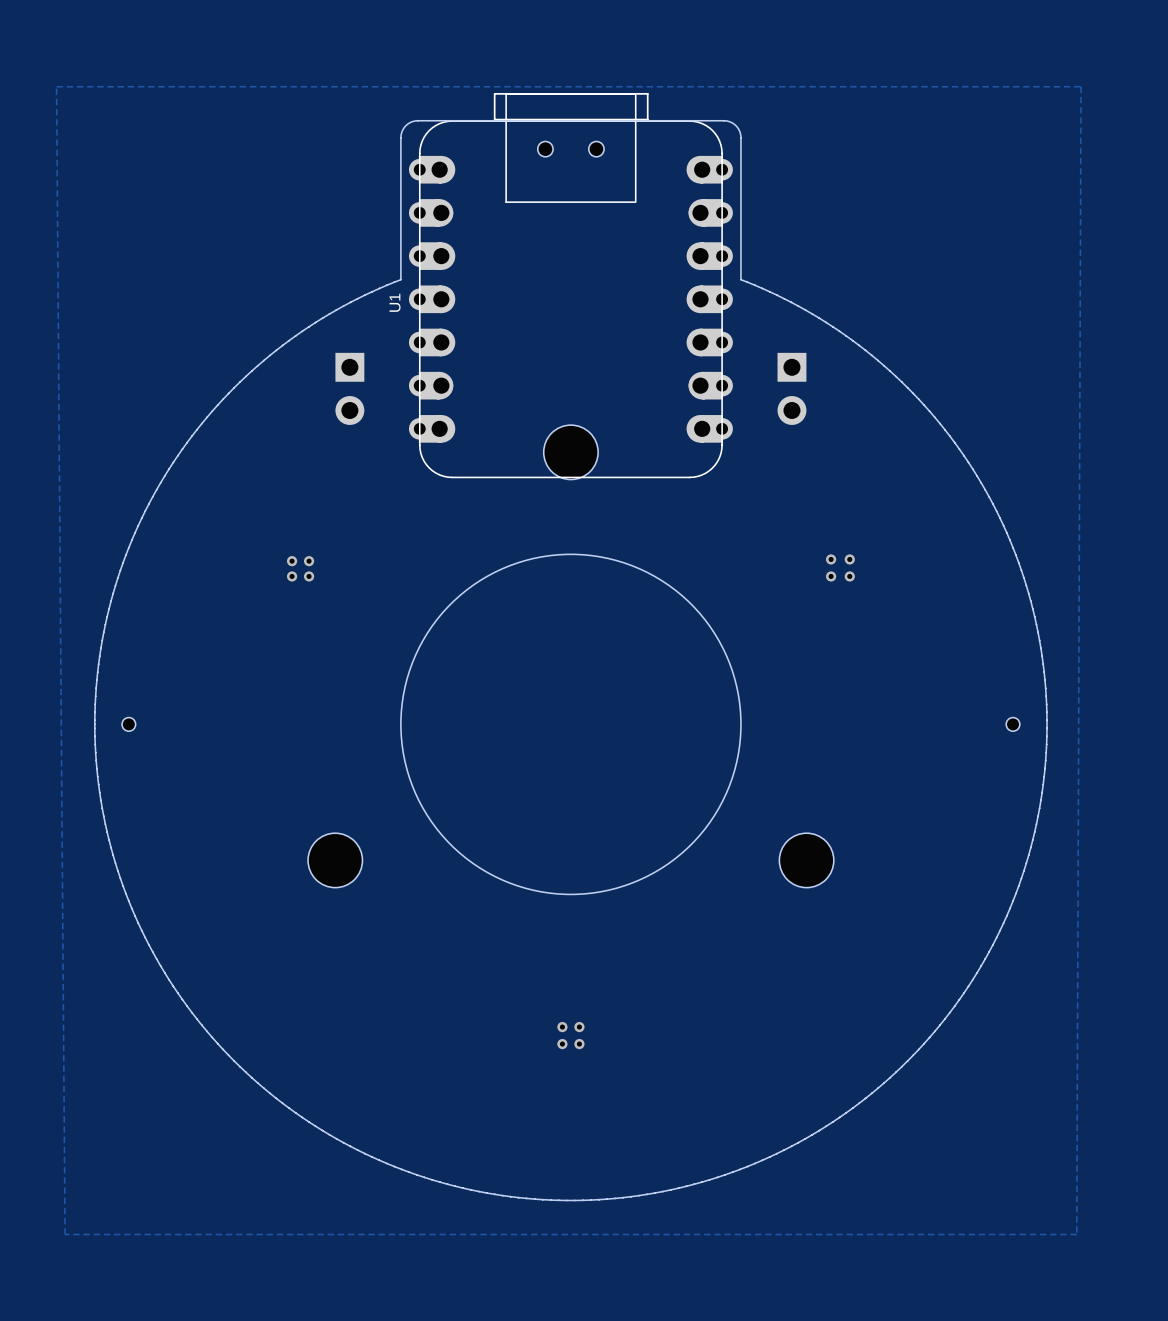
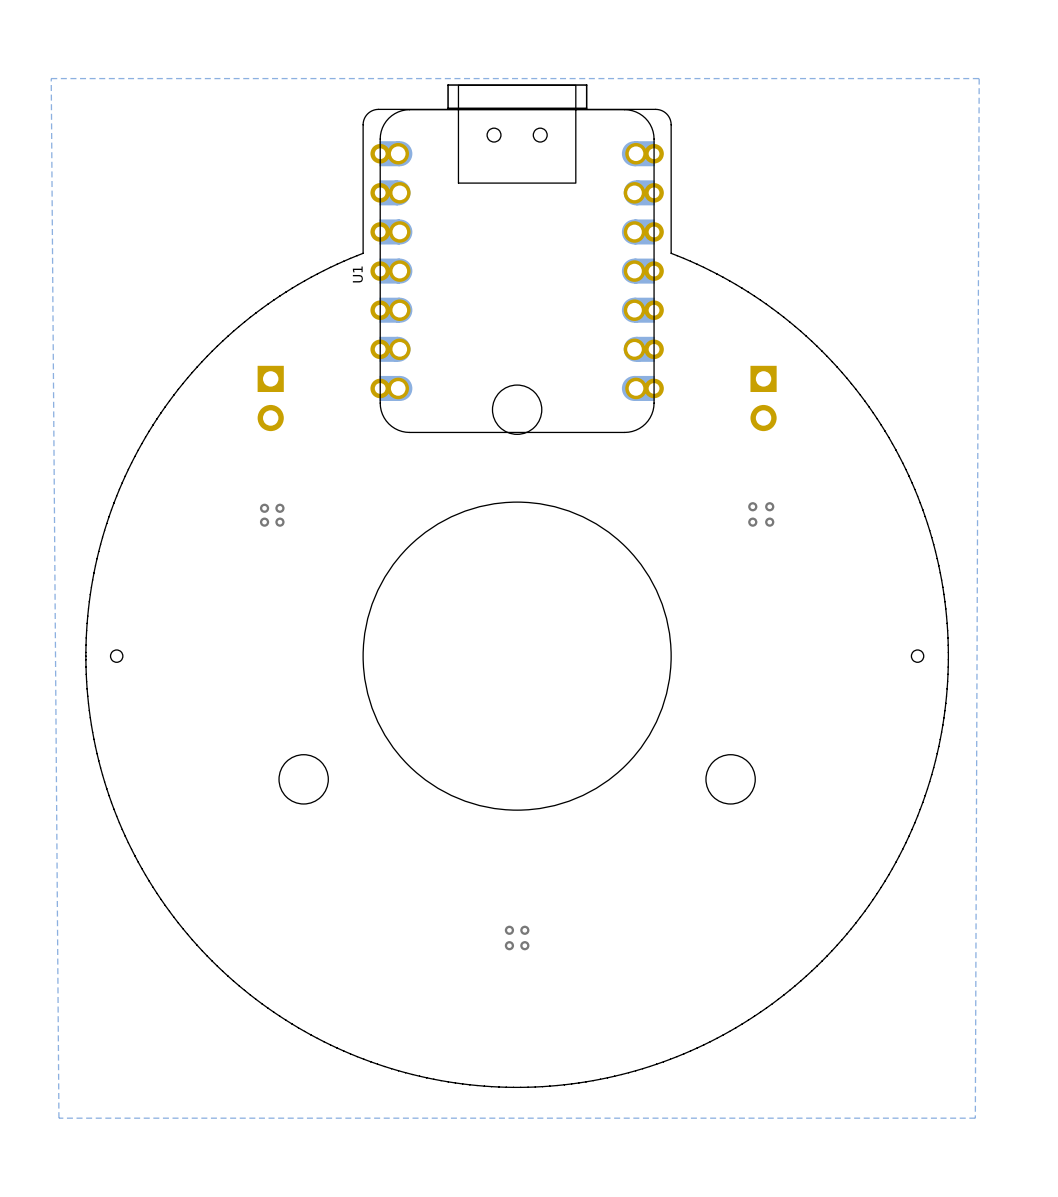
part position: (349, 388) -> (270, 398)
part position: (791, 388) -> (763, 398)

